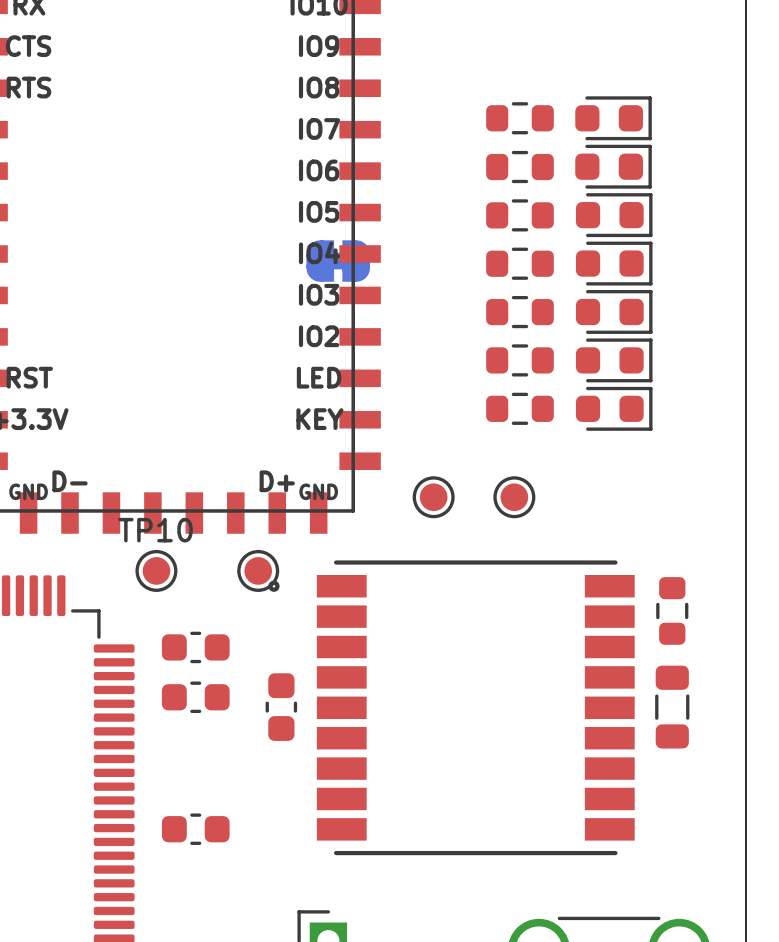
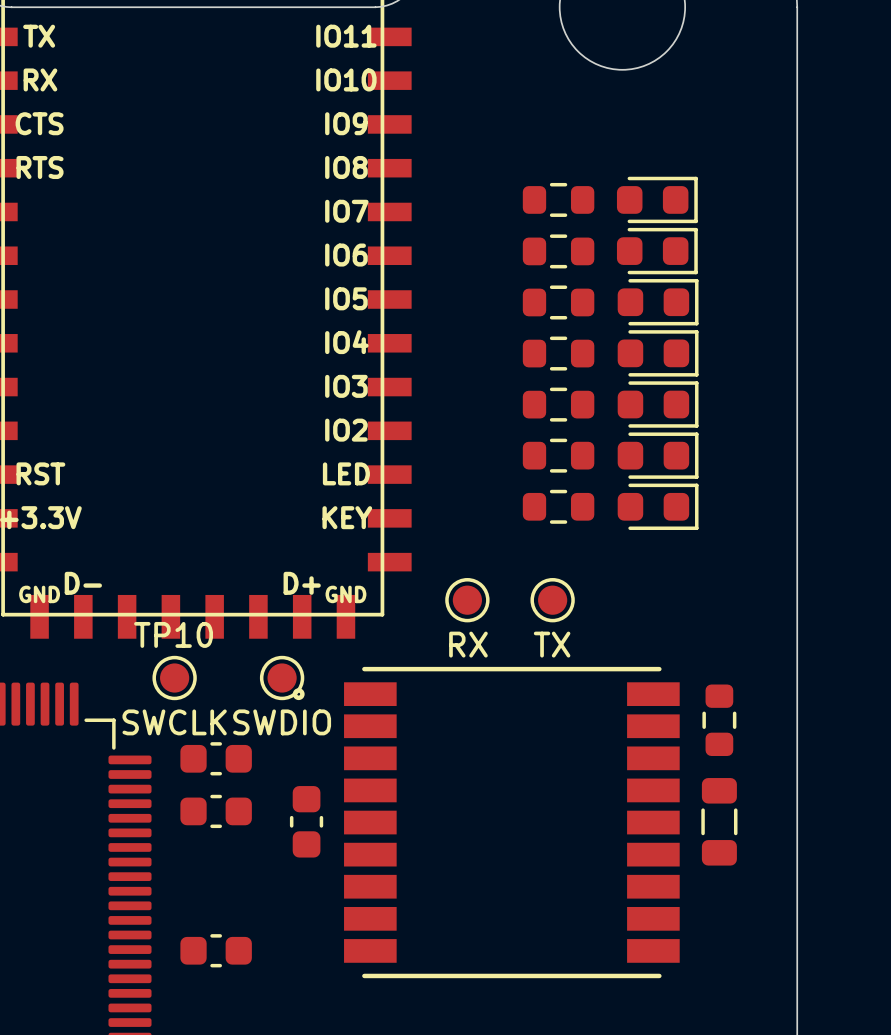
part: (338, 261) -> none
part value: none -> RX (468, 644)
part value: none -> TX (552, 644)
TP10 value: none -> SWCLK (174, 722)
part value: none -> SWDIO (282, 722)

